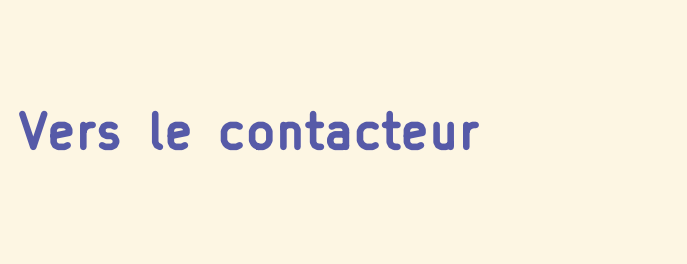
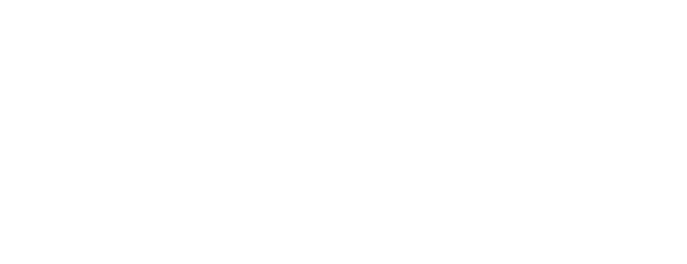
text: Vers le contacteur (249, 130) -> none

